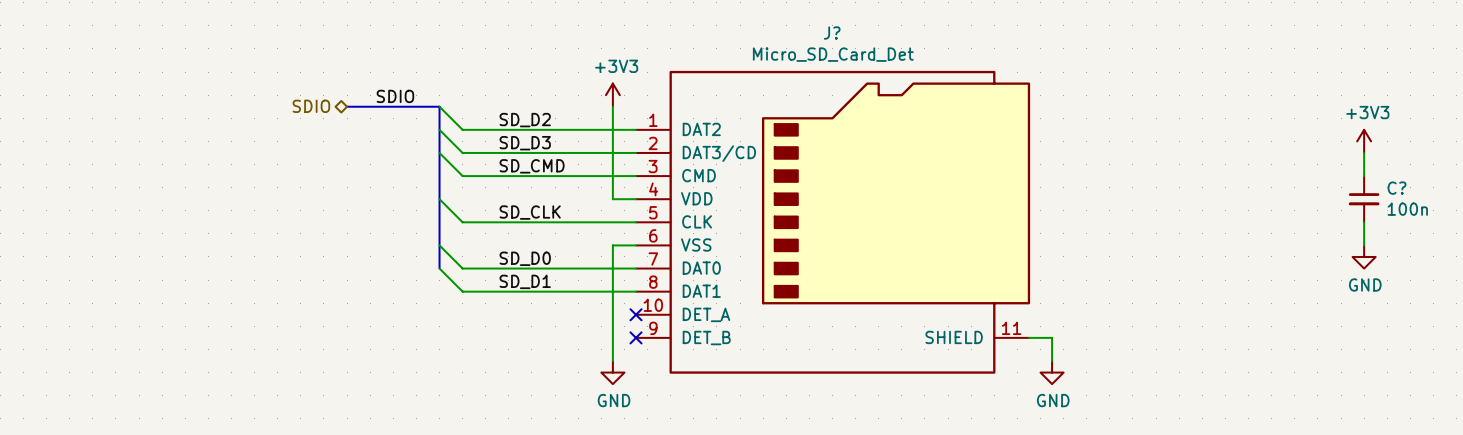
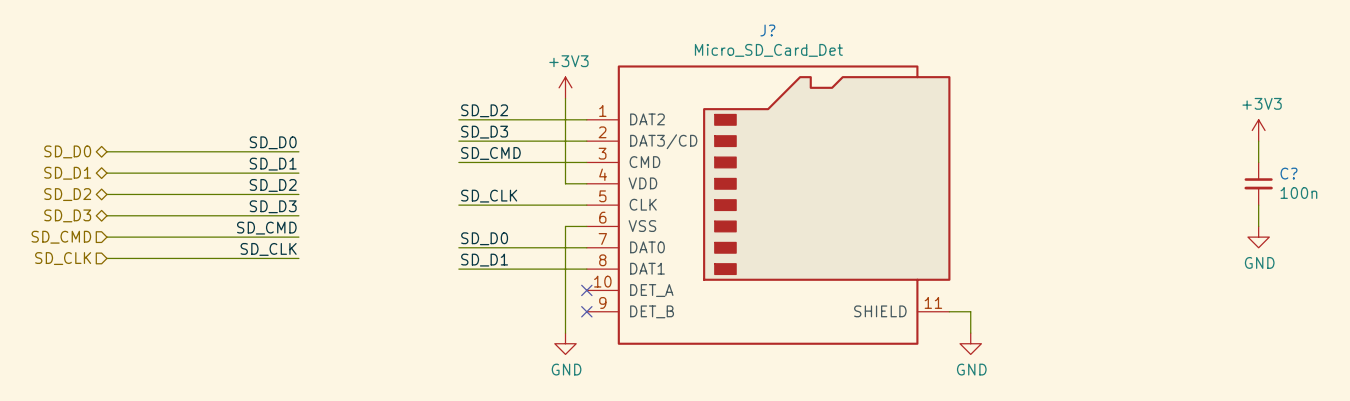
label: SDIO (395, 96) -> none
hierarchical label: SDIO (311, 106) -> none
bus: (347, 106) (439, 106) (439, 268) -> none
wire: (439, 106) (462, 129) (497, 129) -> none
wire: (439, 129) (462, 152) (497, 152) -> none
wire: (439, 152) (462, 176) (497, 176) -> none
label: none -> SD_D0 (273, 142)
hierarchical label: none -> SD_D0 (67, 151)
wire: none -> (106, 151) (298, 151)
label: none -> SD_D1 (273, 164)
hierarchical label: none -> SD_D1 (67, 173)
wire: none -> (106, 173) (298, 173)
wire: (439, 199) (462, 222) (497, 222) -> none
label: none -> SD_D2 (273, 185)
hierarchical label: none -> SD_D2 (67, 194)
wire: none -> (106, 194) (298, 194)
label: none -> SD_D3 (273, 206)
hierarchical label: none -> SD_D3 (67, 215)
wire: none -> (106, 215) (298, 215)
wire: (439, 245) (462, 268) (497, 268) -> none
label: none -> SD_CMD (266, 228)
wire: none -> (106, 237) (298, 237)
hierarchical label: none -> SD_CMD (61, 237)
wire: (439, 268) (462, 291) (497, 291) -> none
label: none -> SD_CLK (268, 249)
hierarchical label: none -> SD_CLK (63, 258)
wire: none -> (106, 258) (298, 258)

